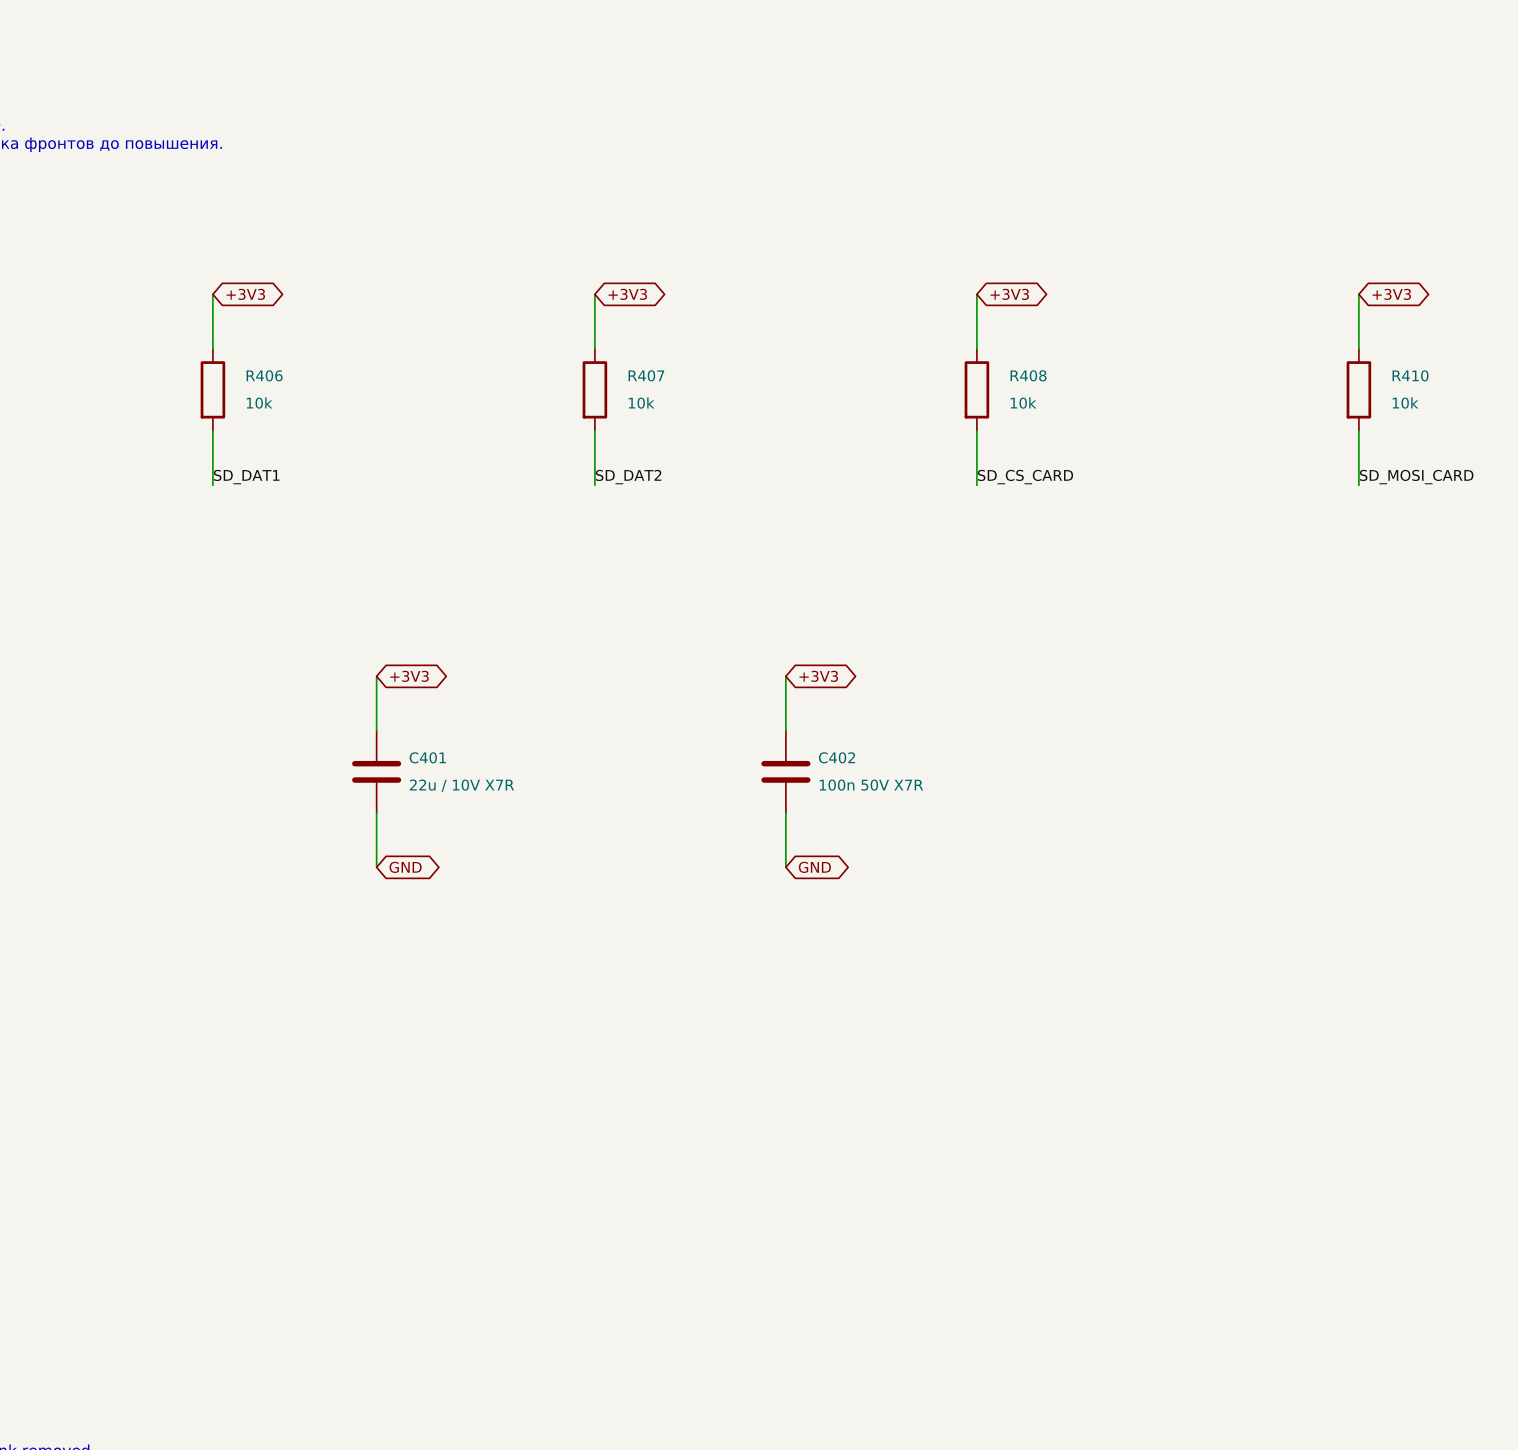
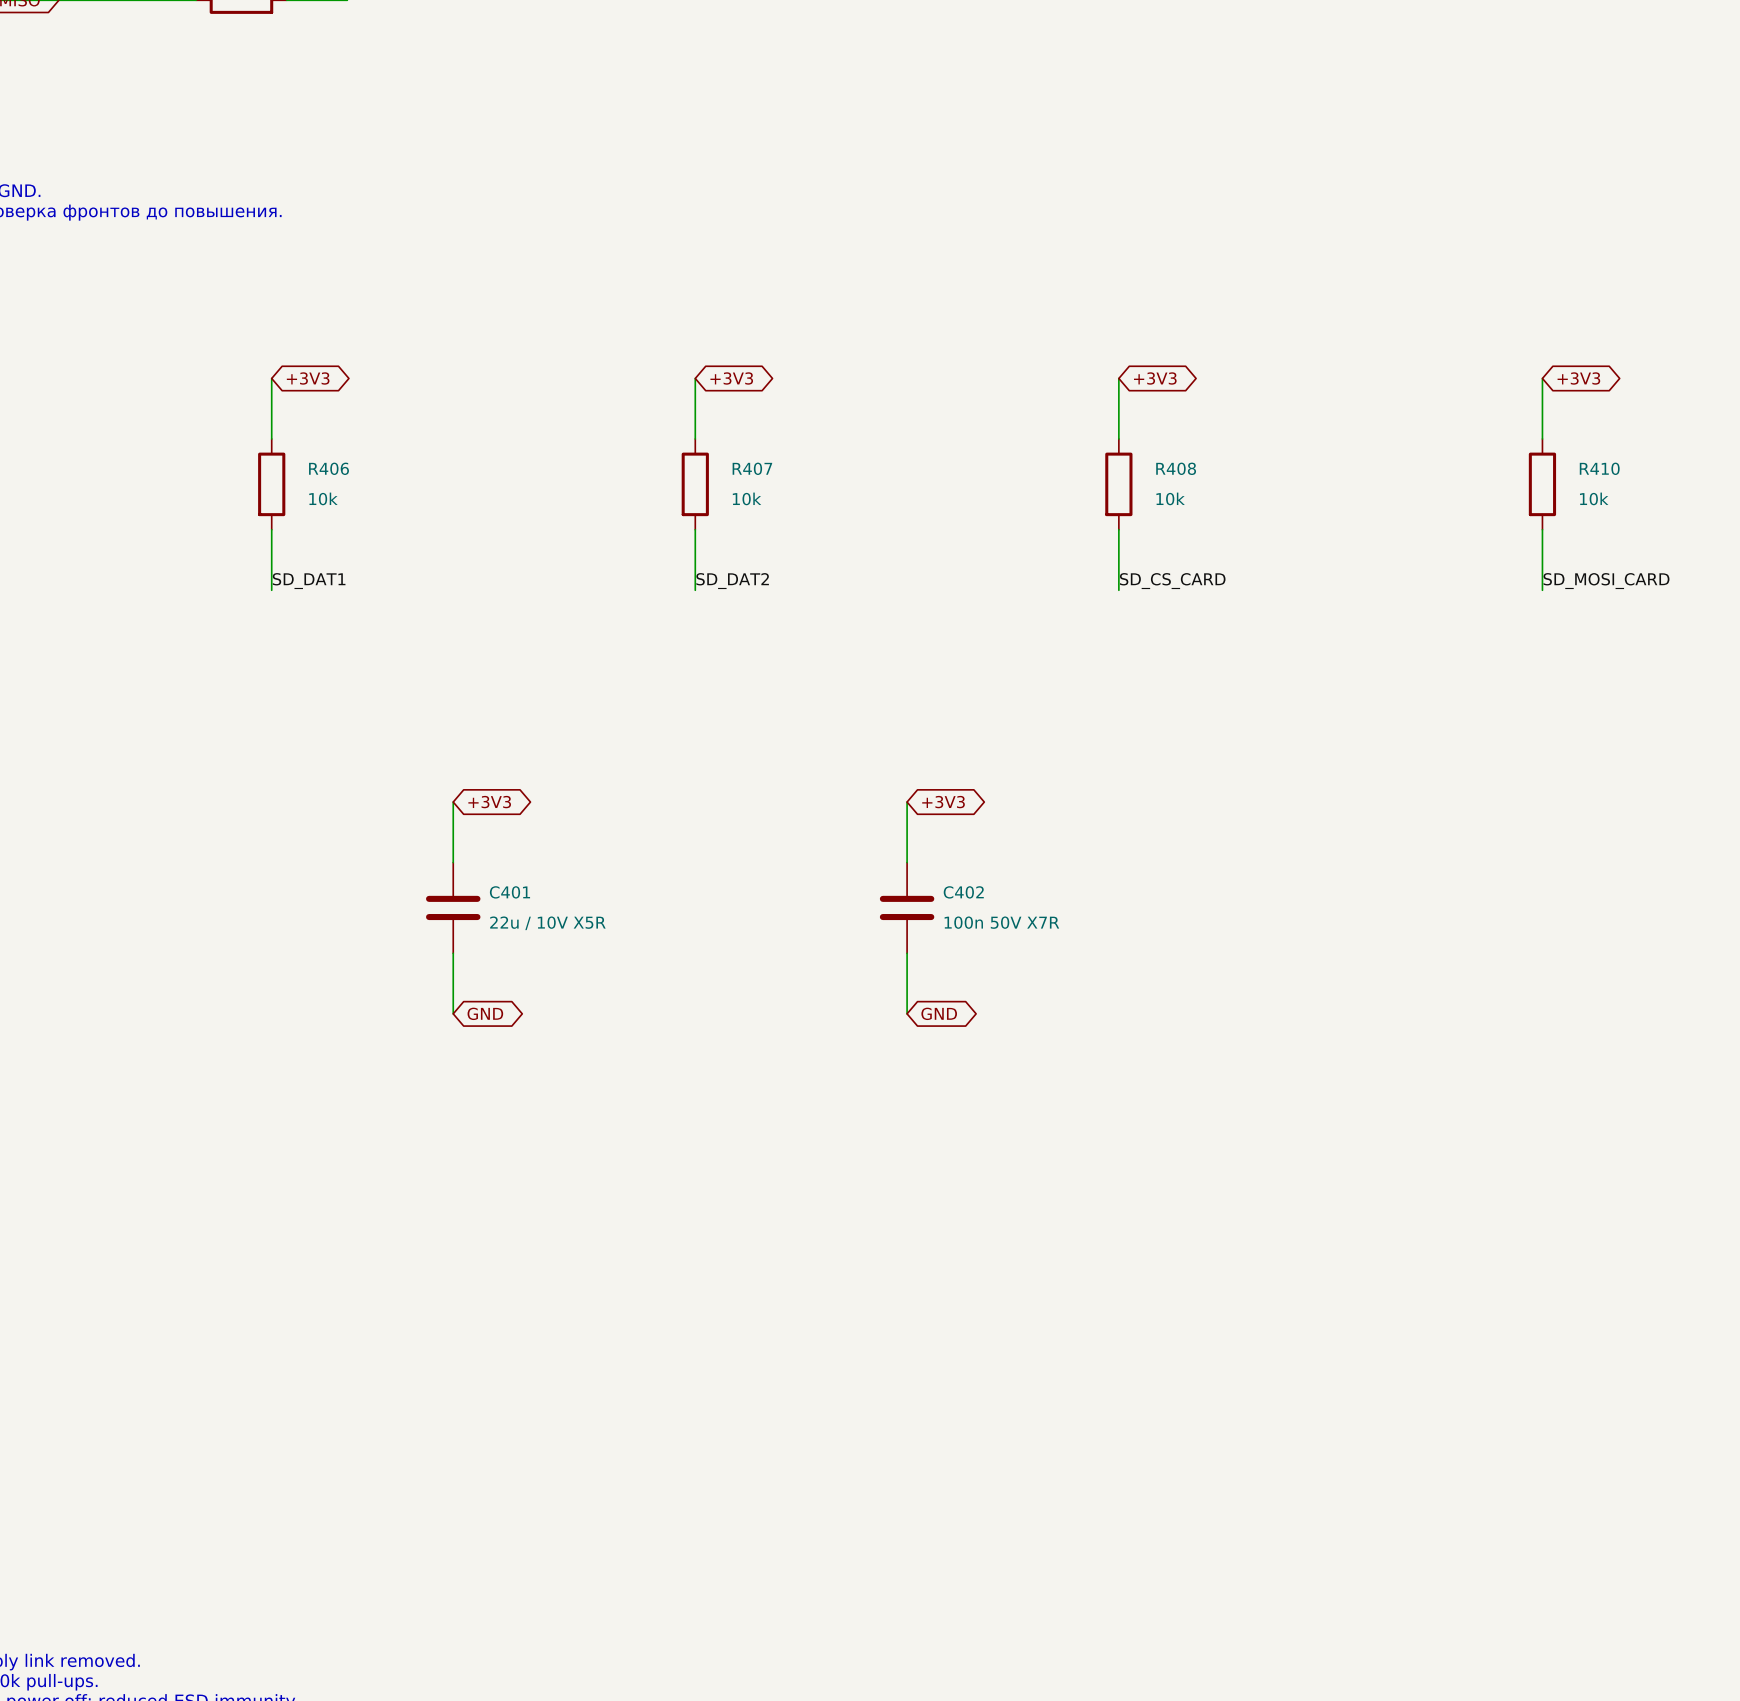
C401 value: 22u / 10V X7R (462, 785) -> 22u / 10V X5R (547, 923)

